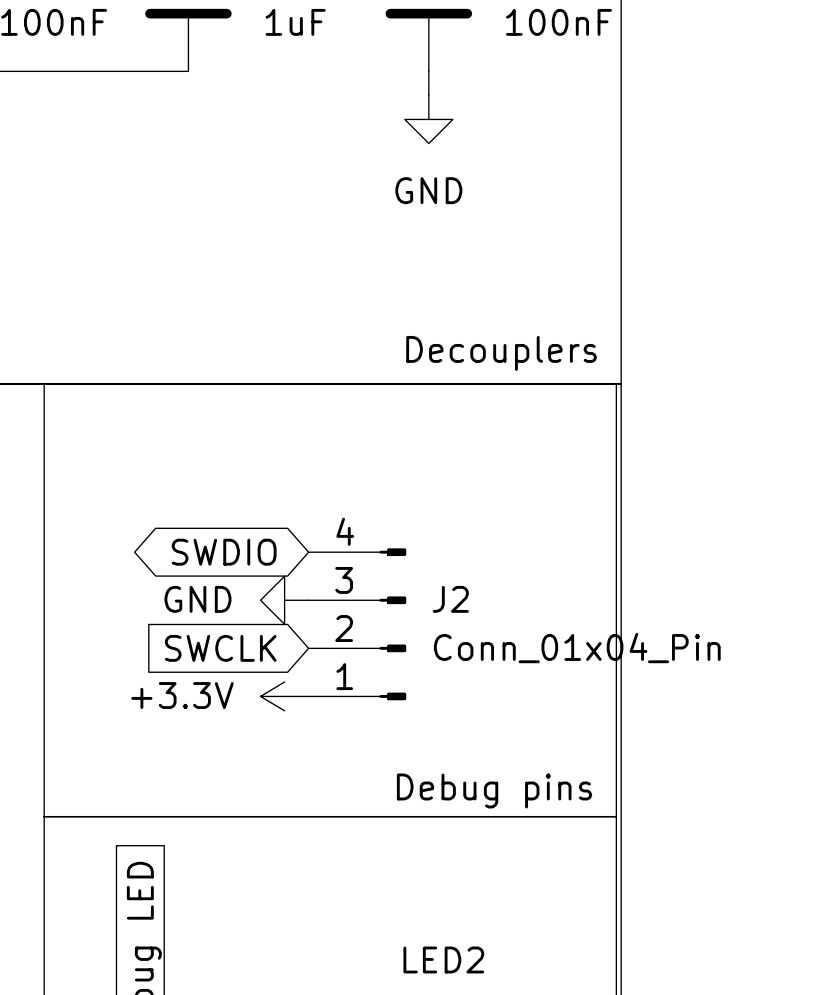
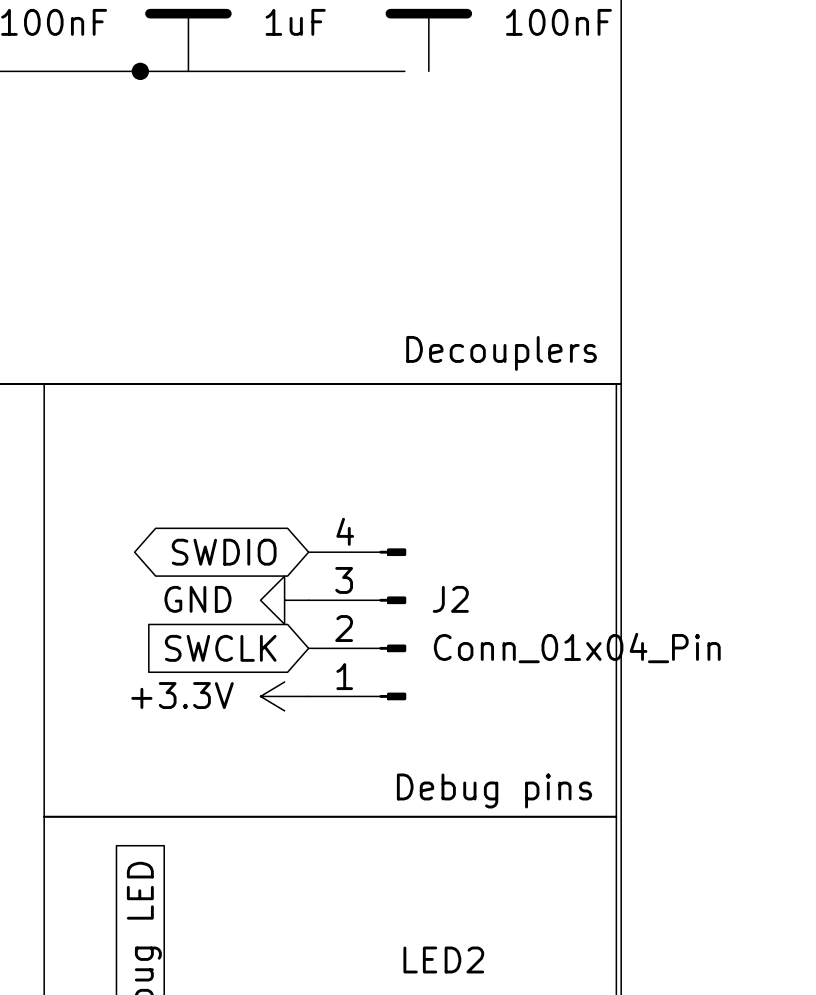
junction: none -> (140, 71)
wire: none -> (188, 71) (404, 71)
wire: (428, 71) (428, 95) -> none
power symbol: GND (428, 119) -> none

